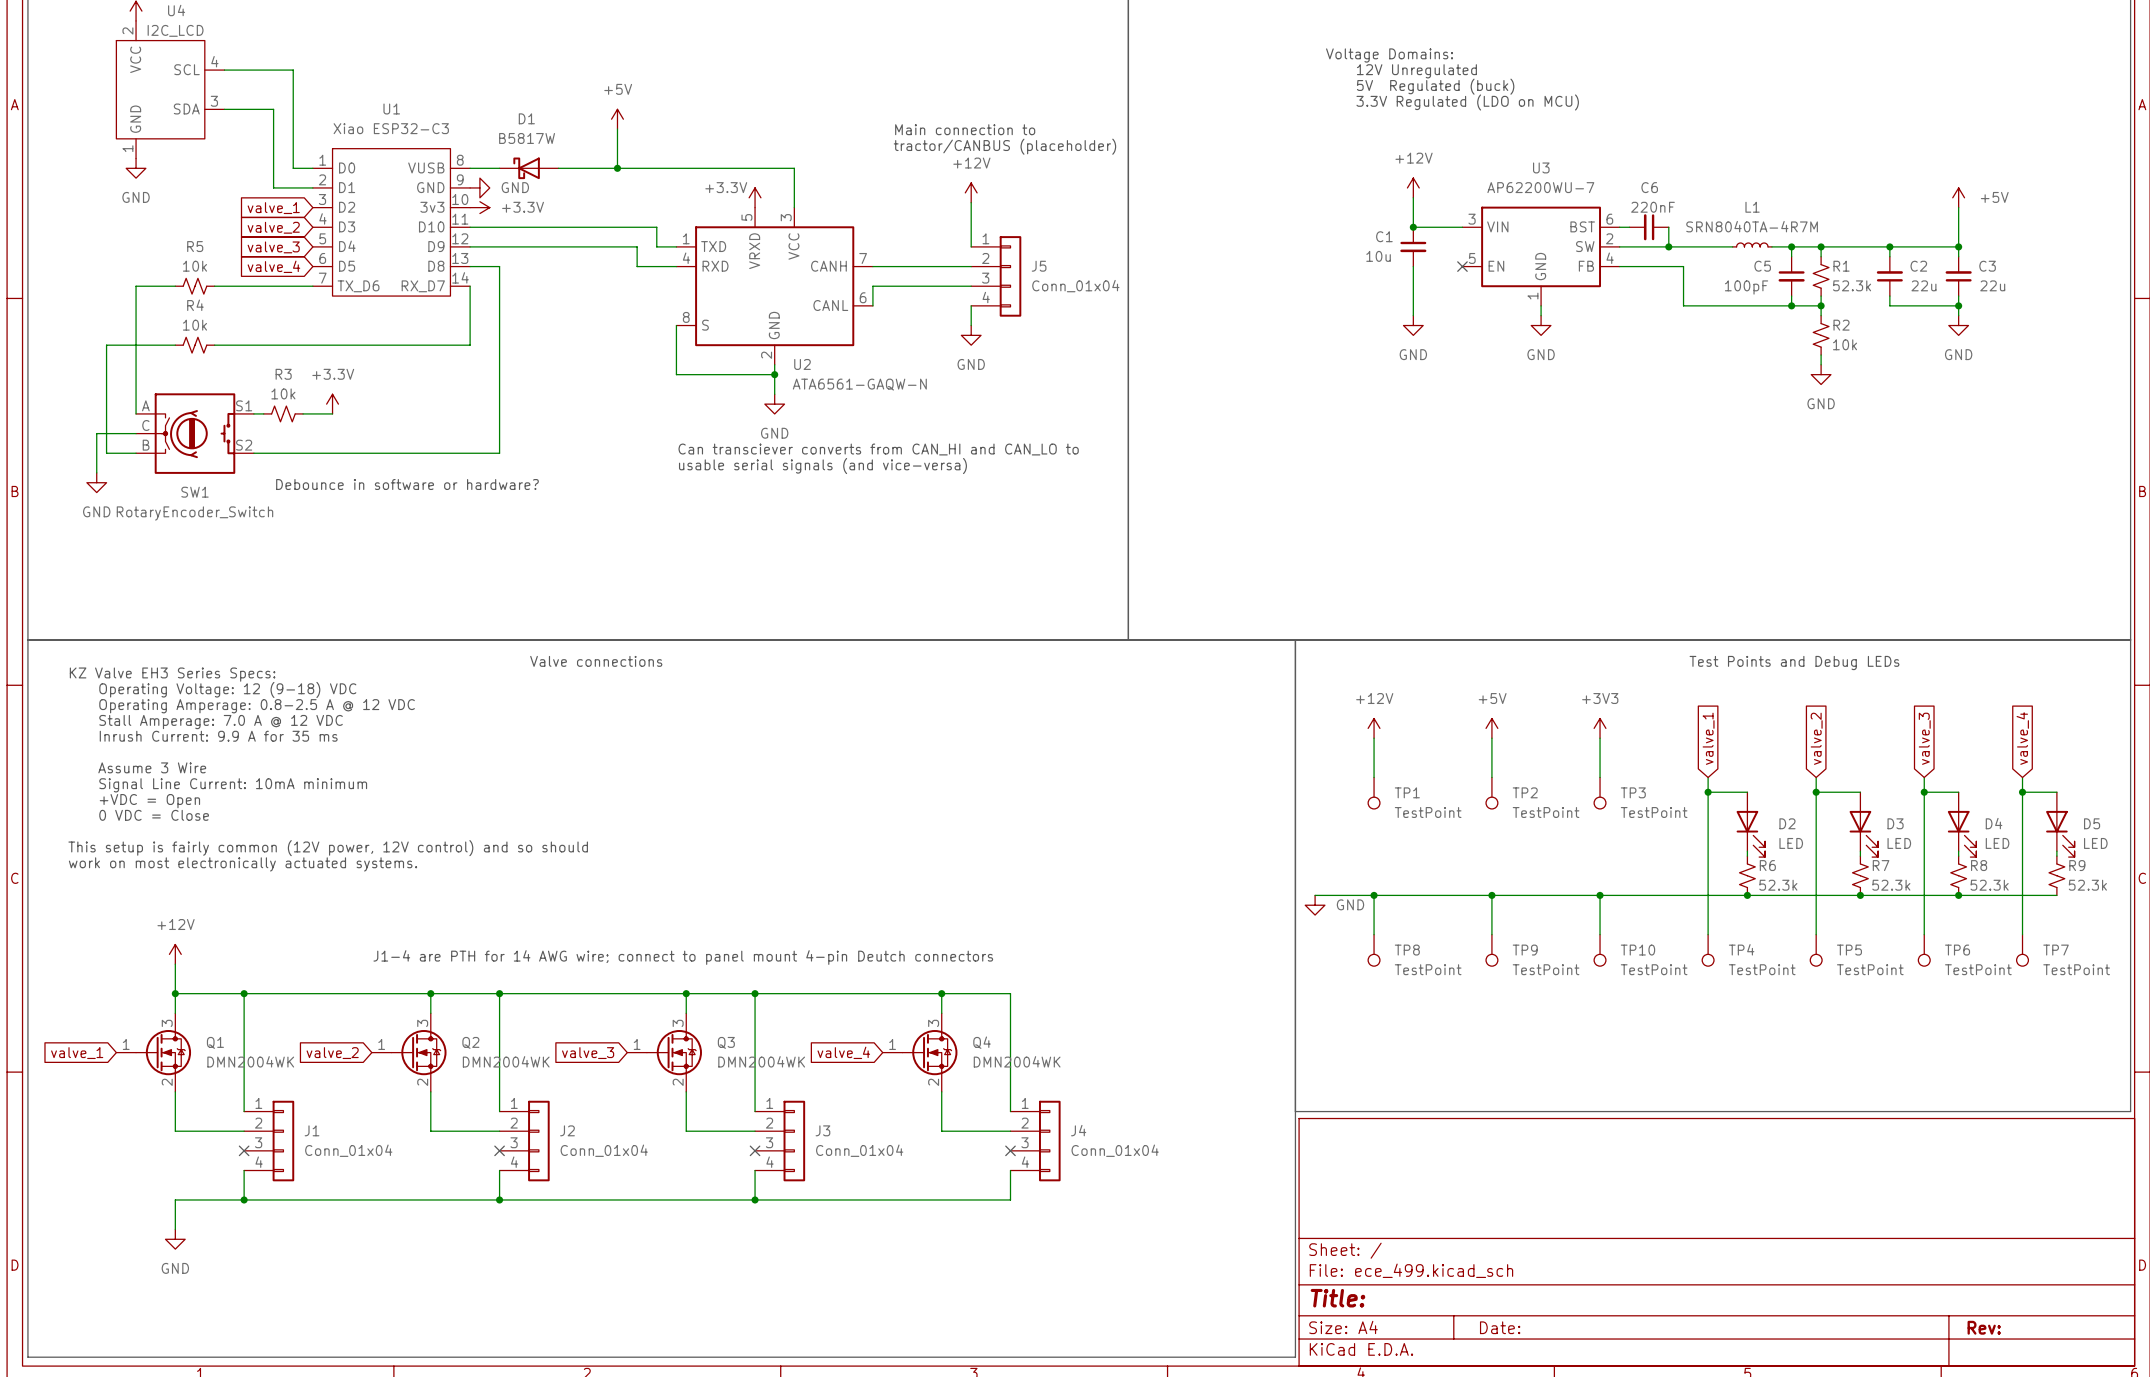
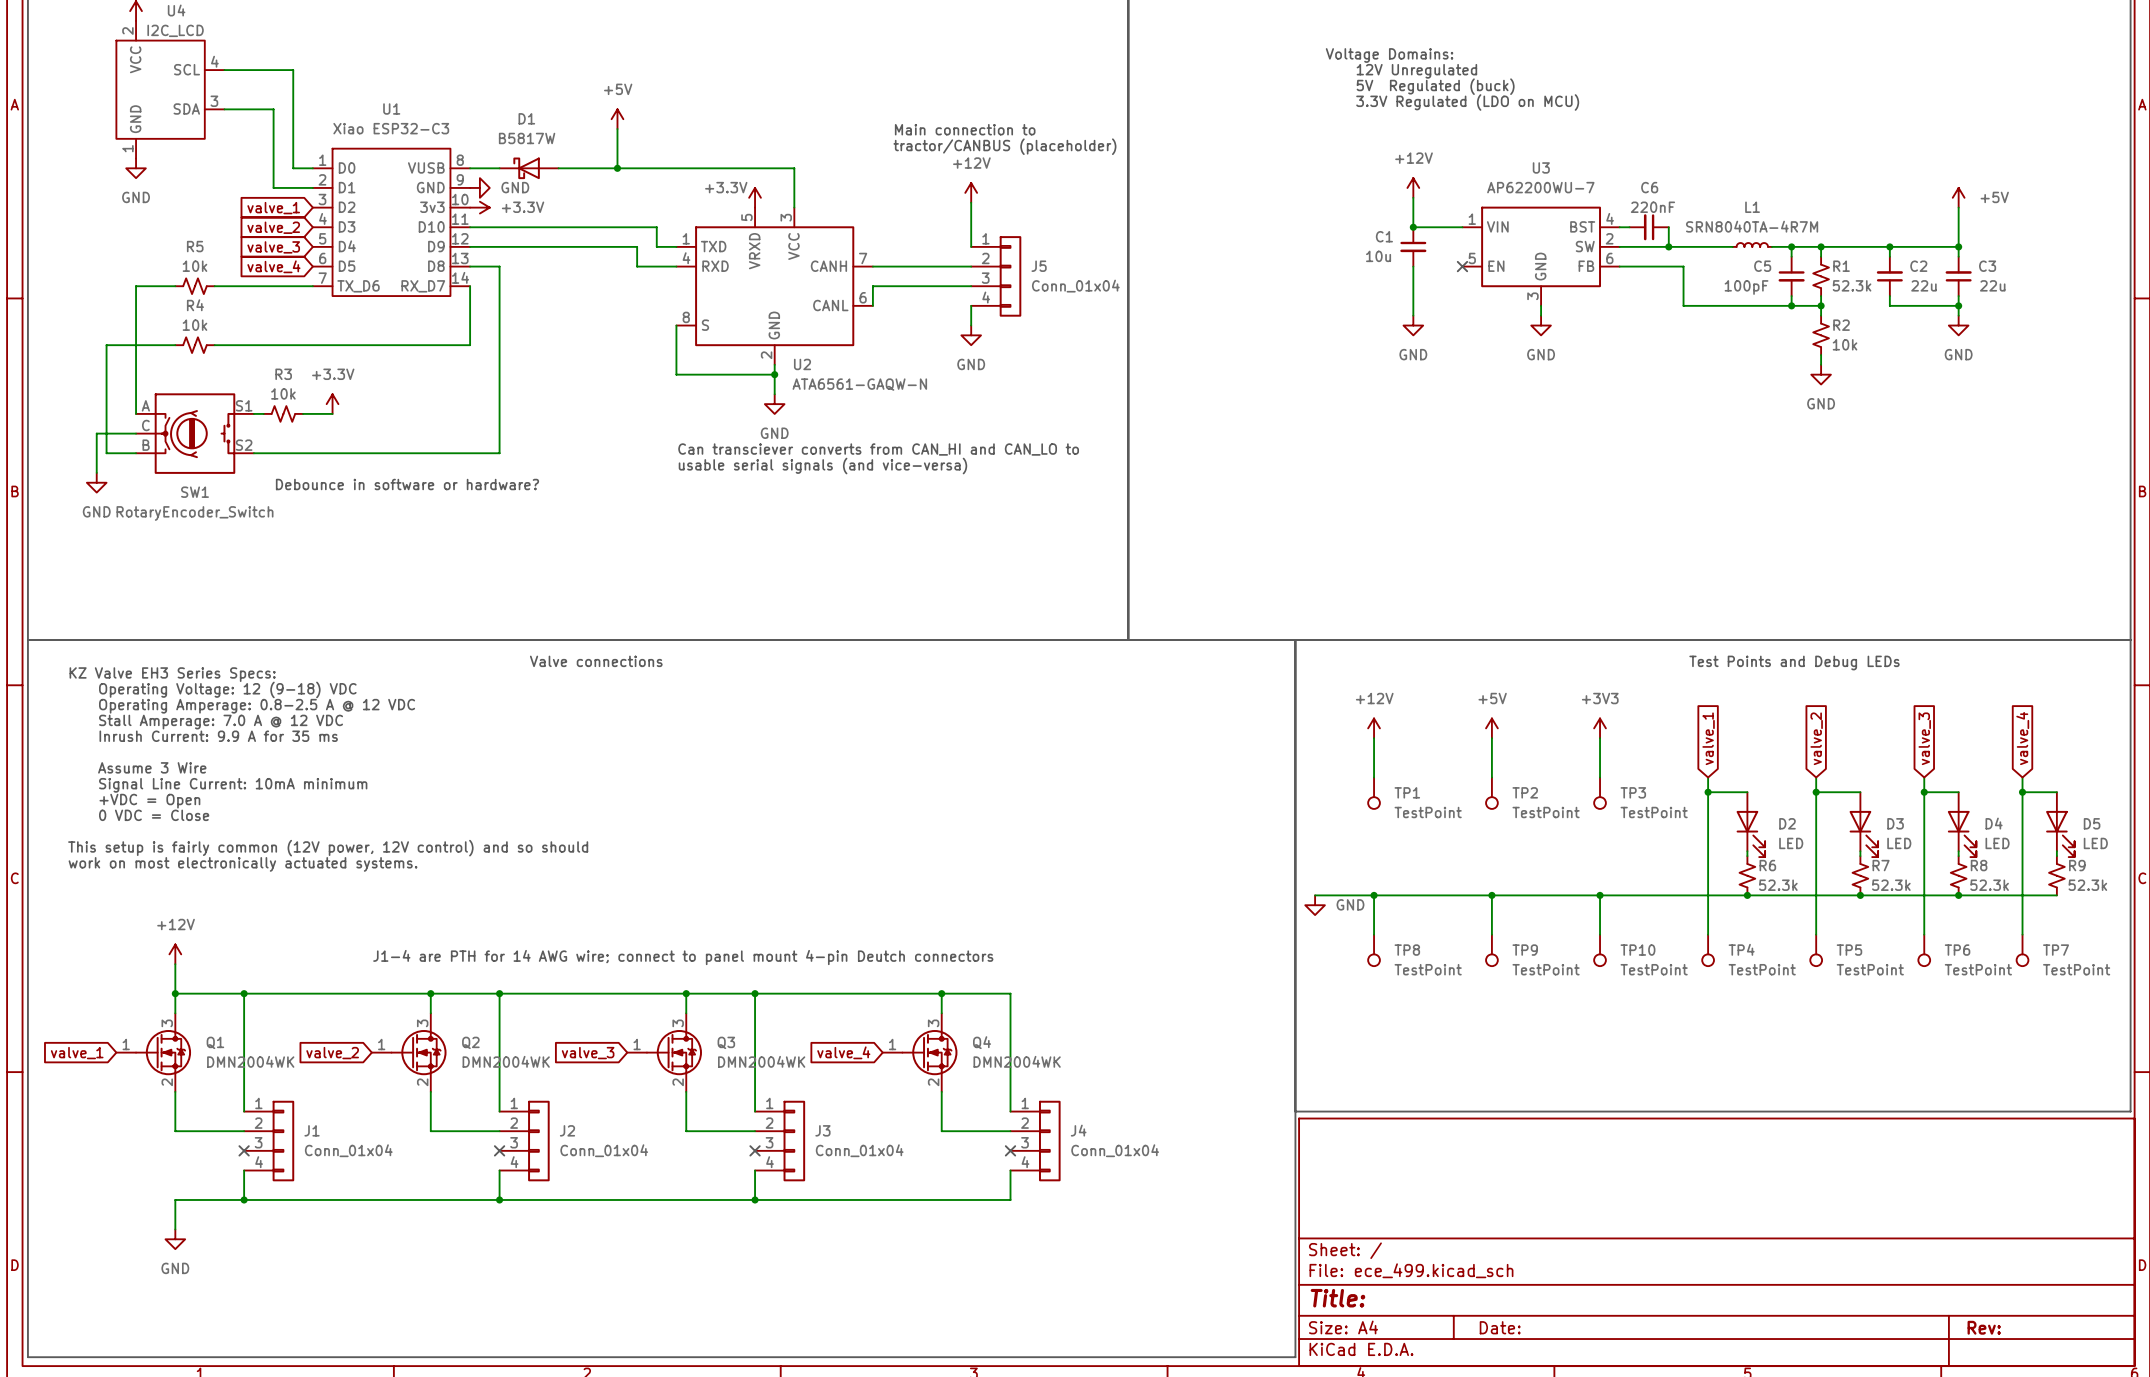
U3 pin number: 3 (1472, 219) -> 1 (1472, 219)
U3 pin number: 6 (1609, 219) -> 4 (1610, 218)
U3 pin number: 4 (1610, 258) -> 6 (1609, 258)
U3 pin number: 1 (1532, 296) -> 3 (1532, 296)

